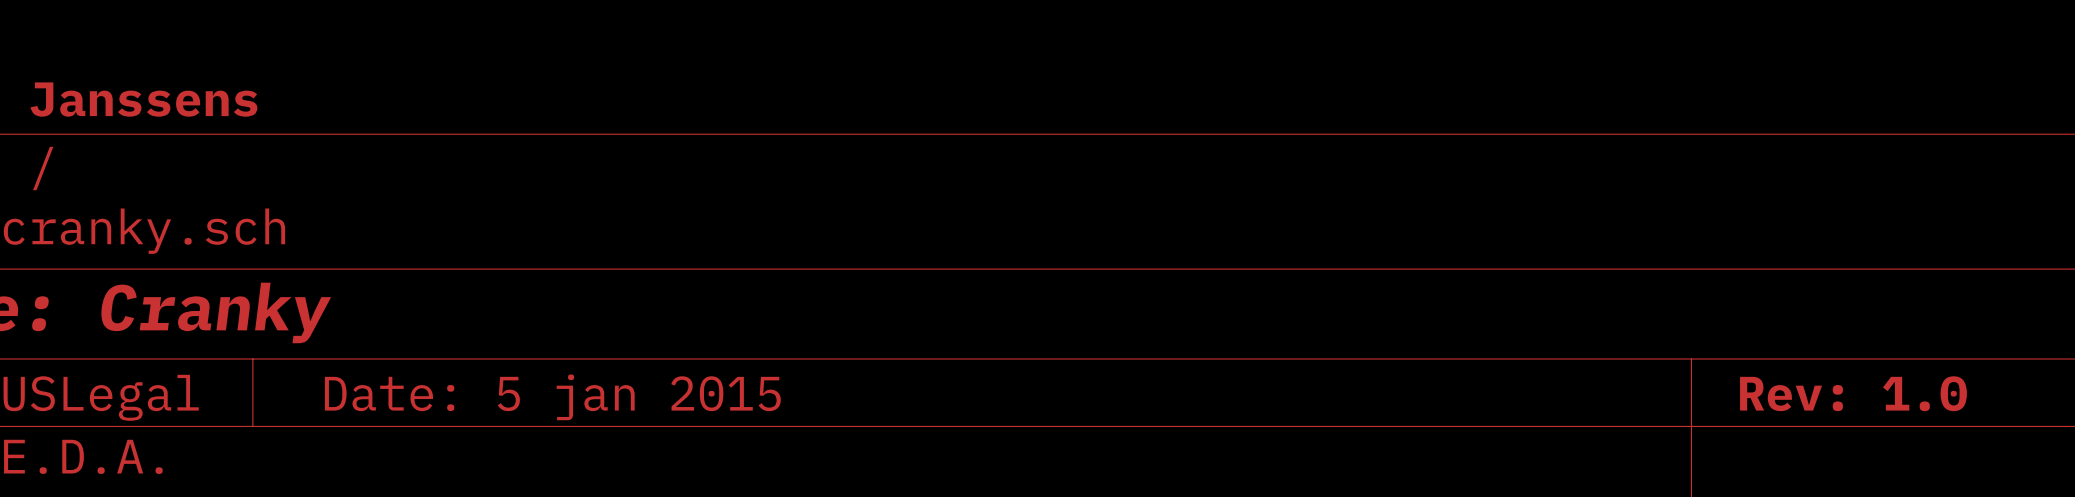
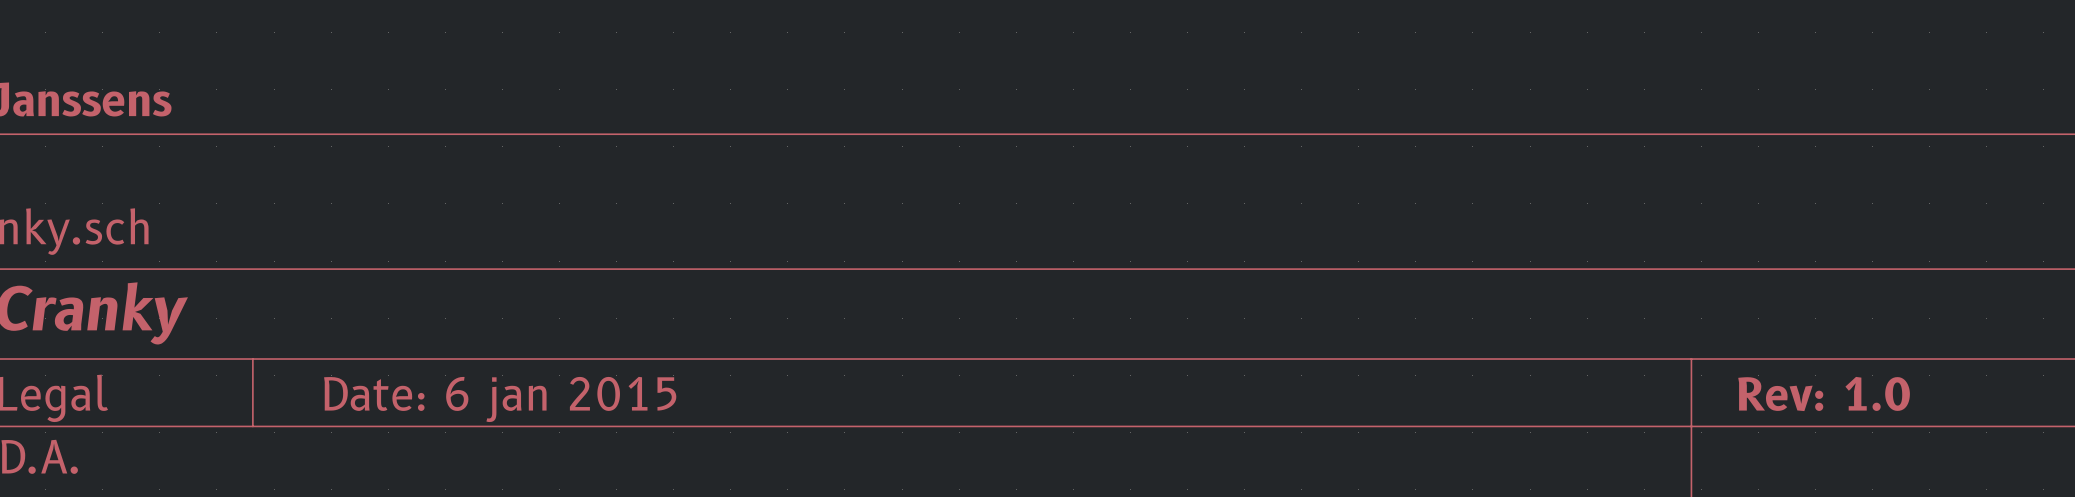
title block: Date: 5 jan 2015 (552, 397) -> Date: 6 jan 2015 (500, 399)

